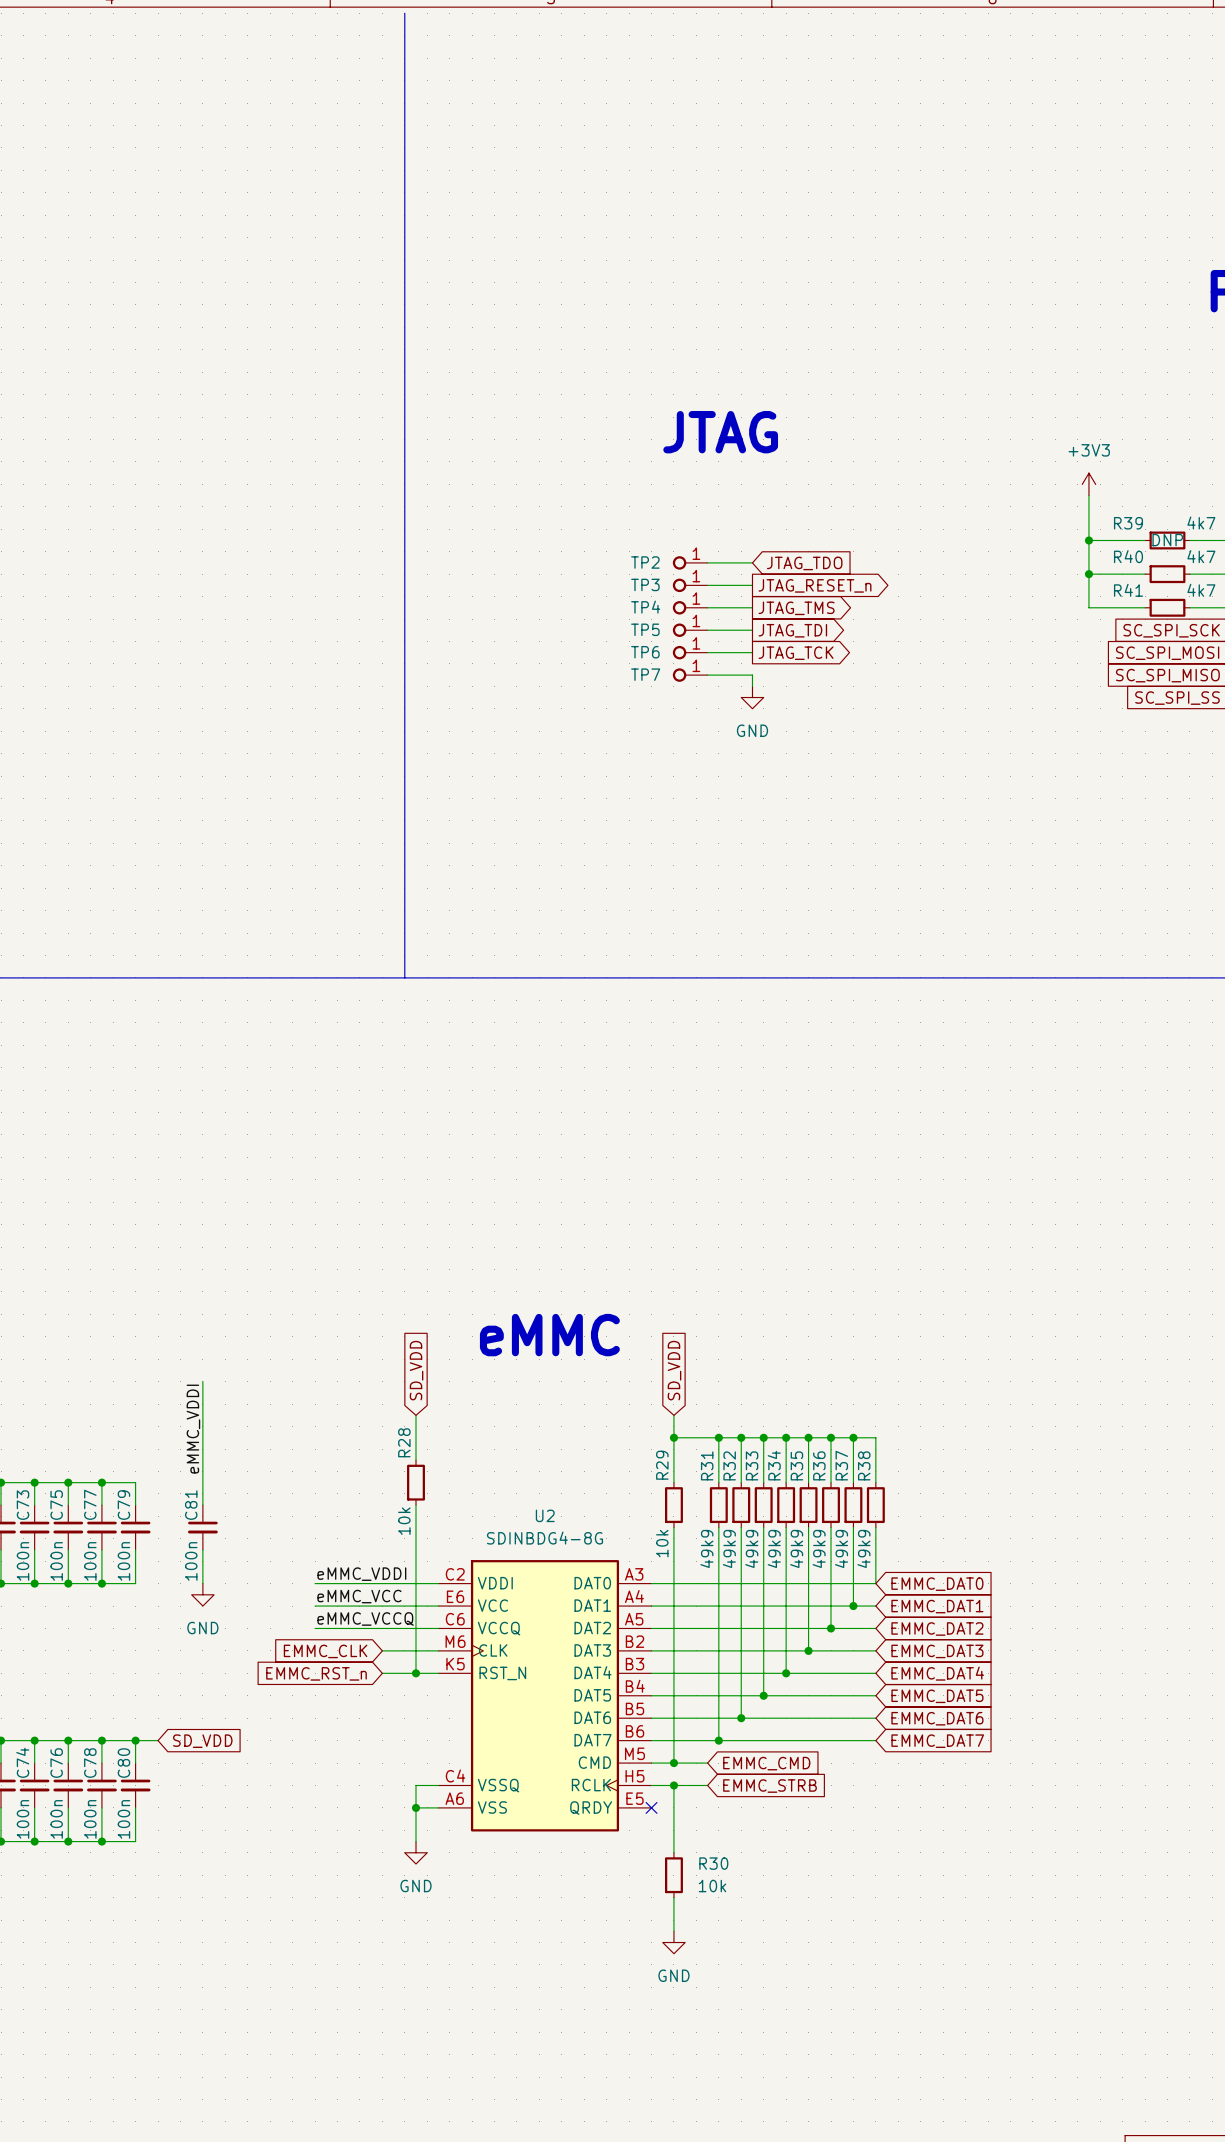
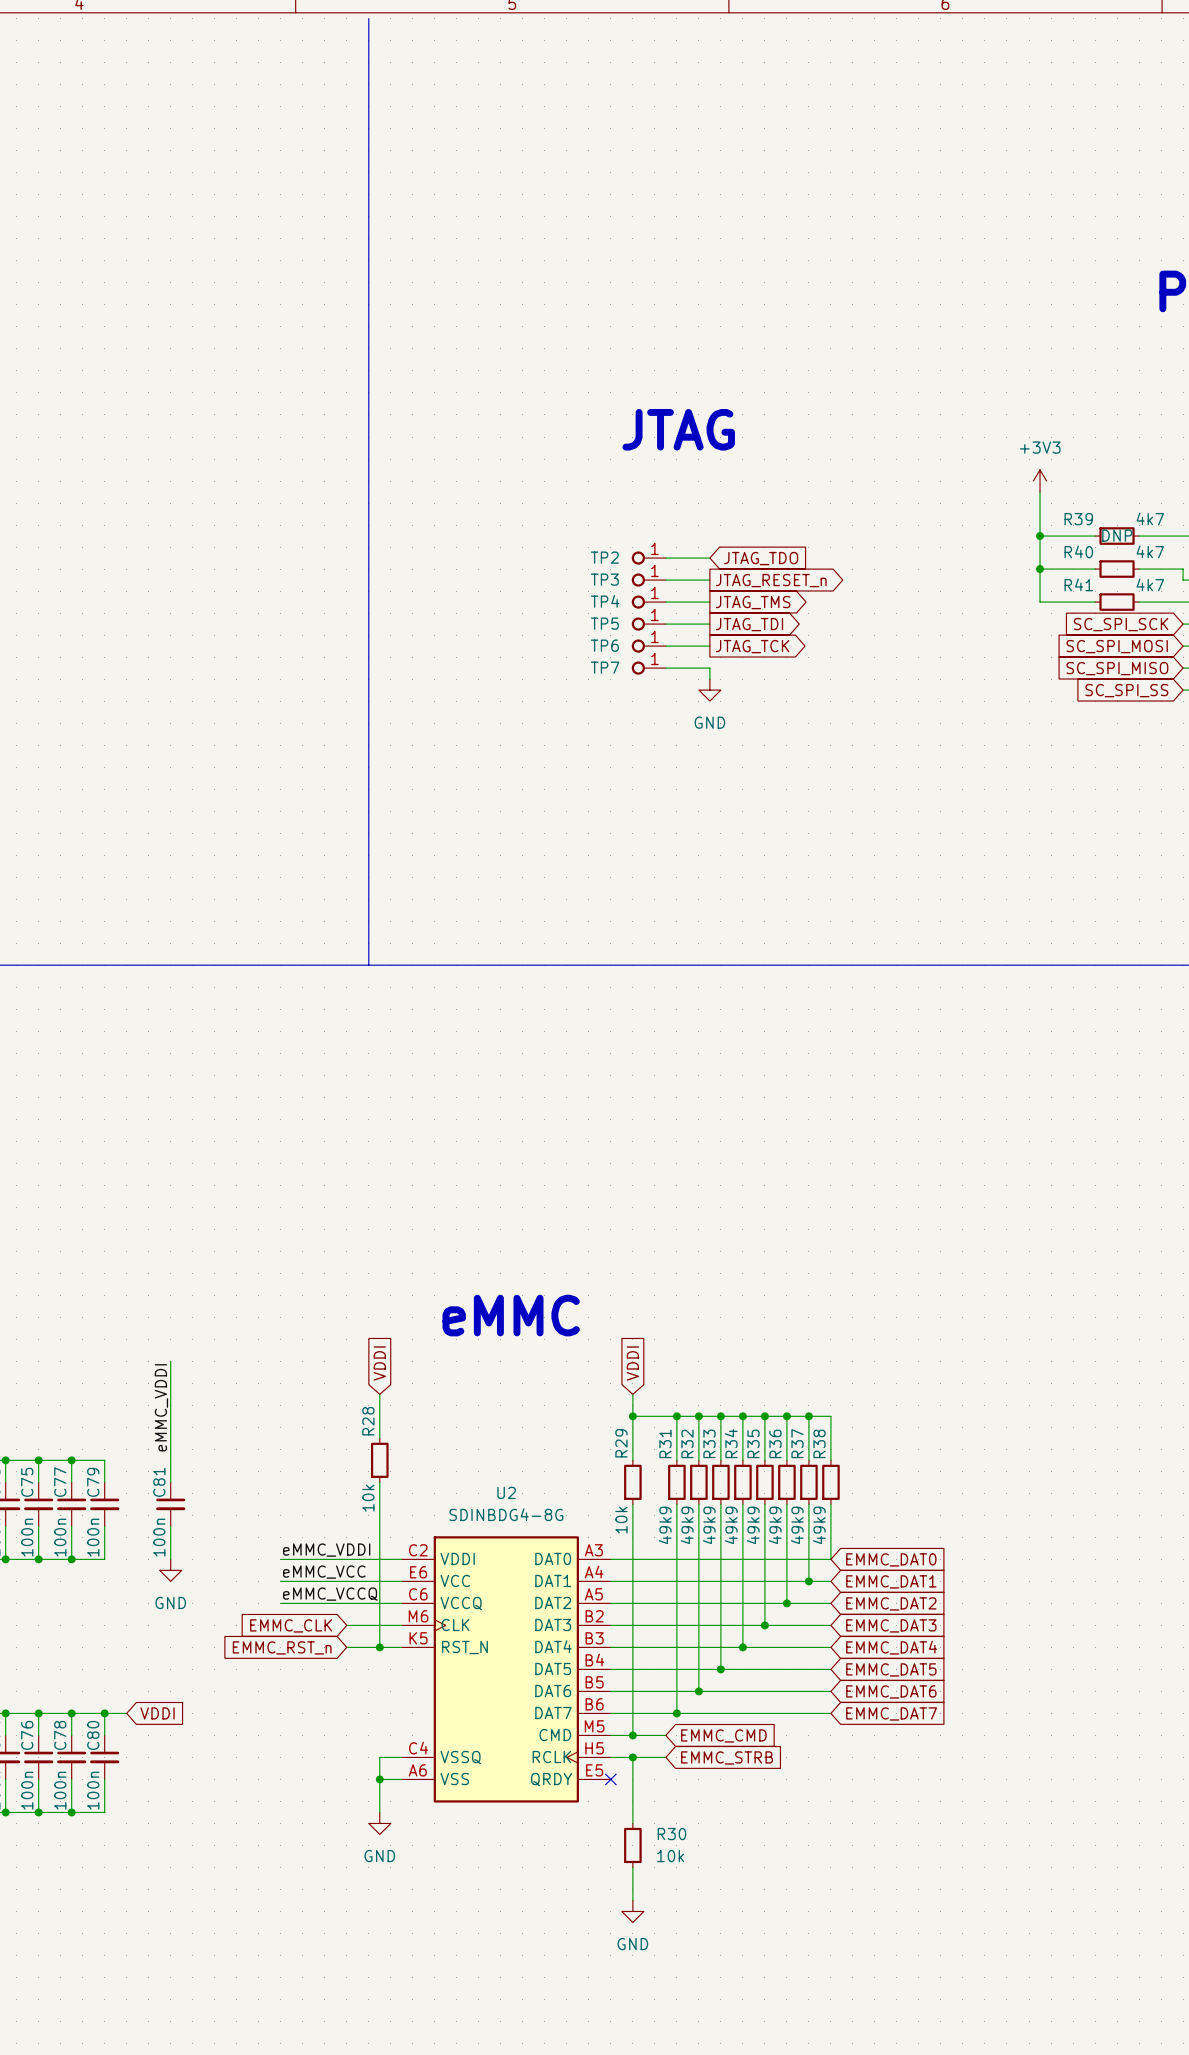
global label: SD_VDD (416, 1370) -> VDDI (379, 1363)
global label: SD_VDD (674, 1370) -> VDDI (632, 1363)
global label: SD_VDD (202, 1741) -> VDDI (157, 1713)

